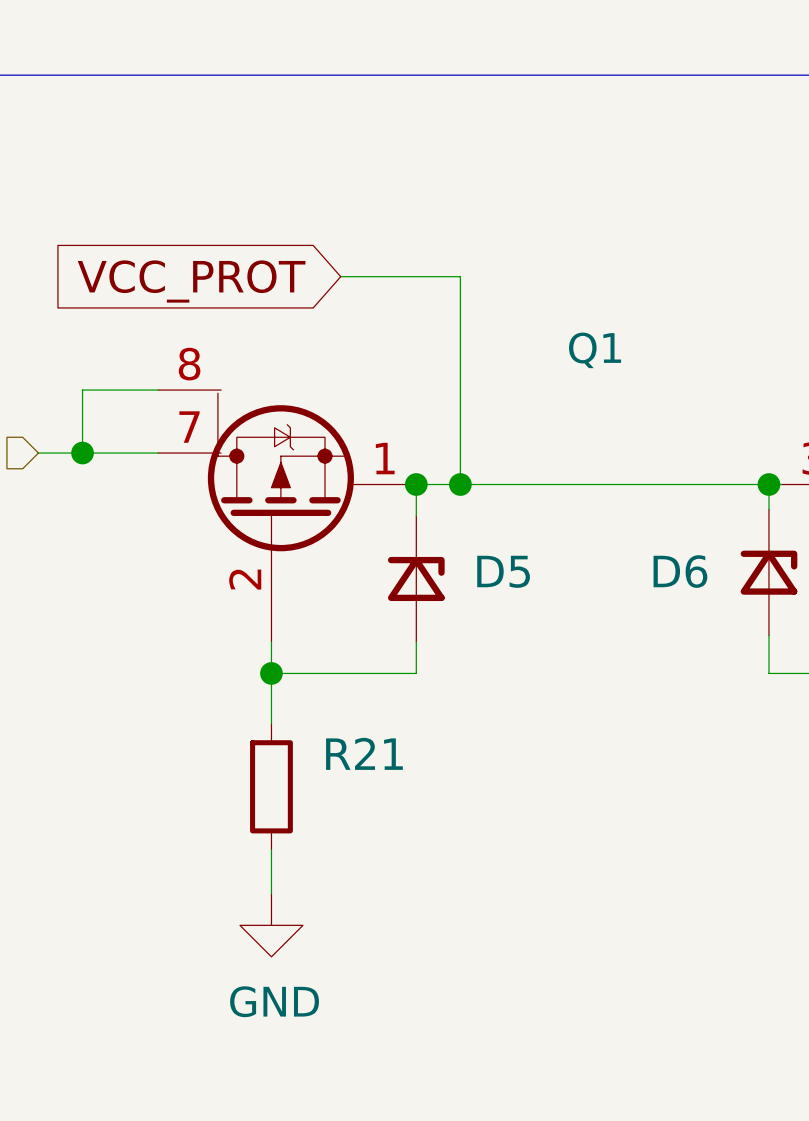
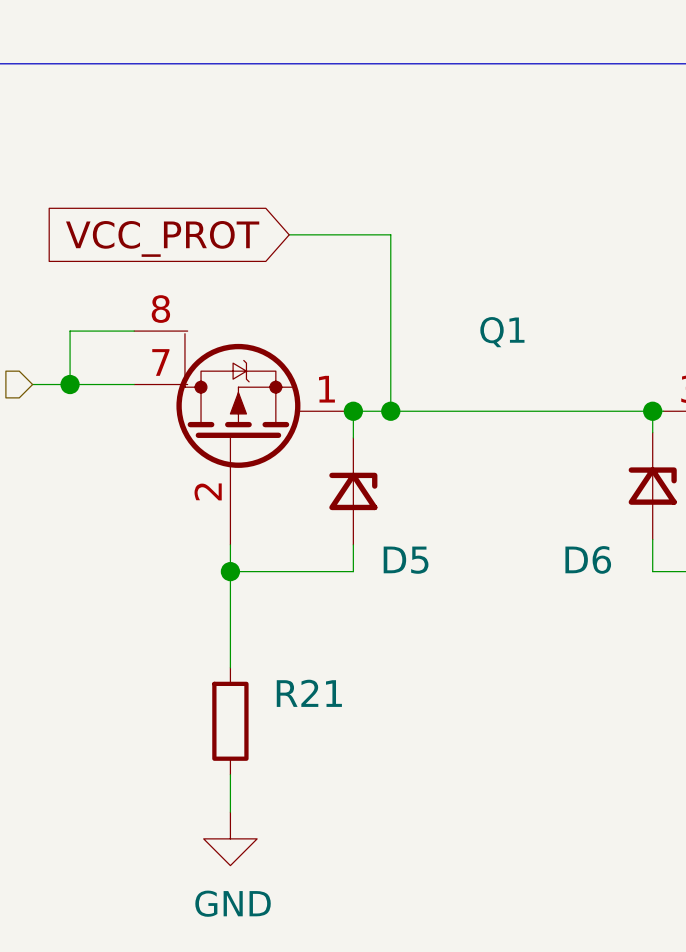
Q1 name position: Q1 (595, 350) -> Q1 (502, 332)
D5 name position: D5 (503, 571) -> D5 (406, 560)
D6 name position: D6 (680, 571) -> D6 (588, 559)
wire: none -> (230, 614) (230, 667)
R21 position: (271, 786) -> (230, 721)
wire: (271, 849) (271, 893) -> (230, 774) (230, 812)
power symbol position: GND (271, 925) -> GND (230, 838)

